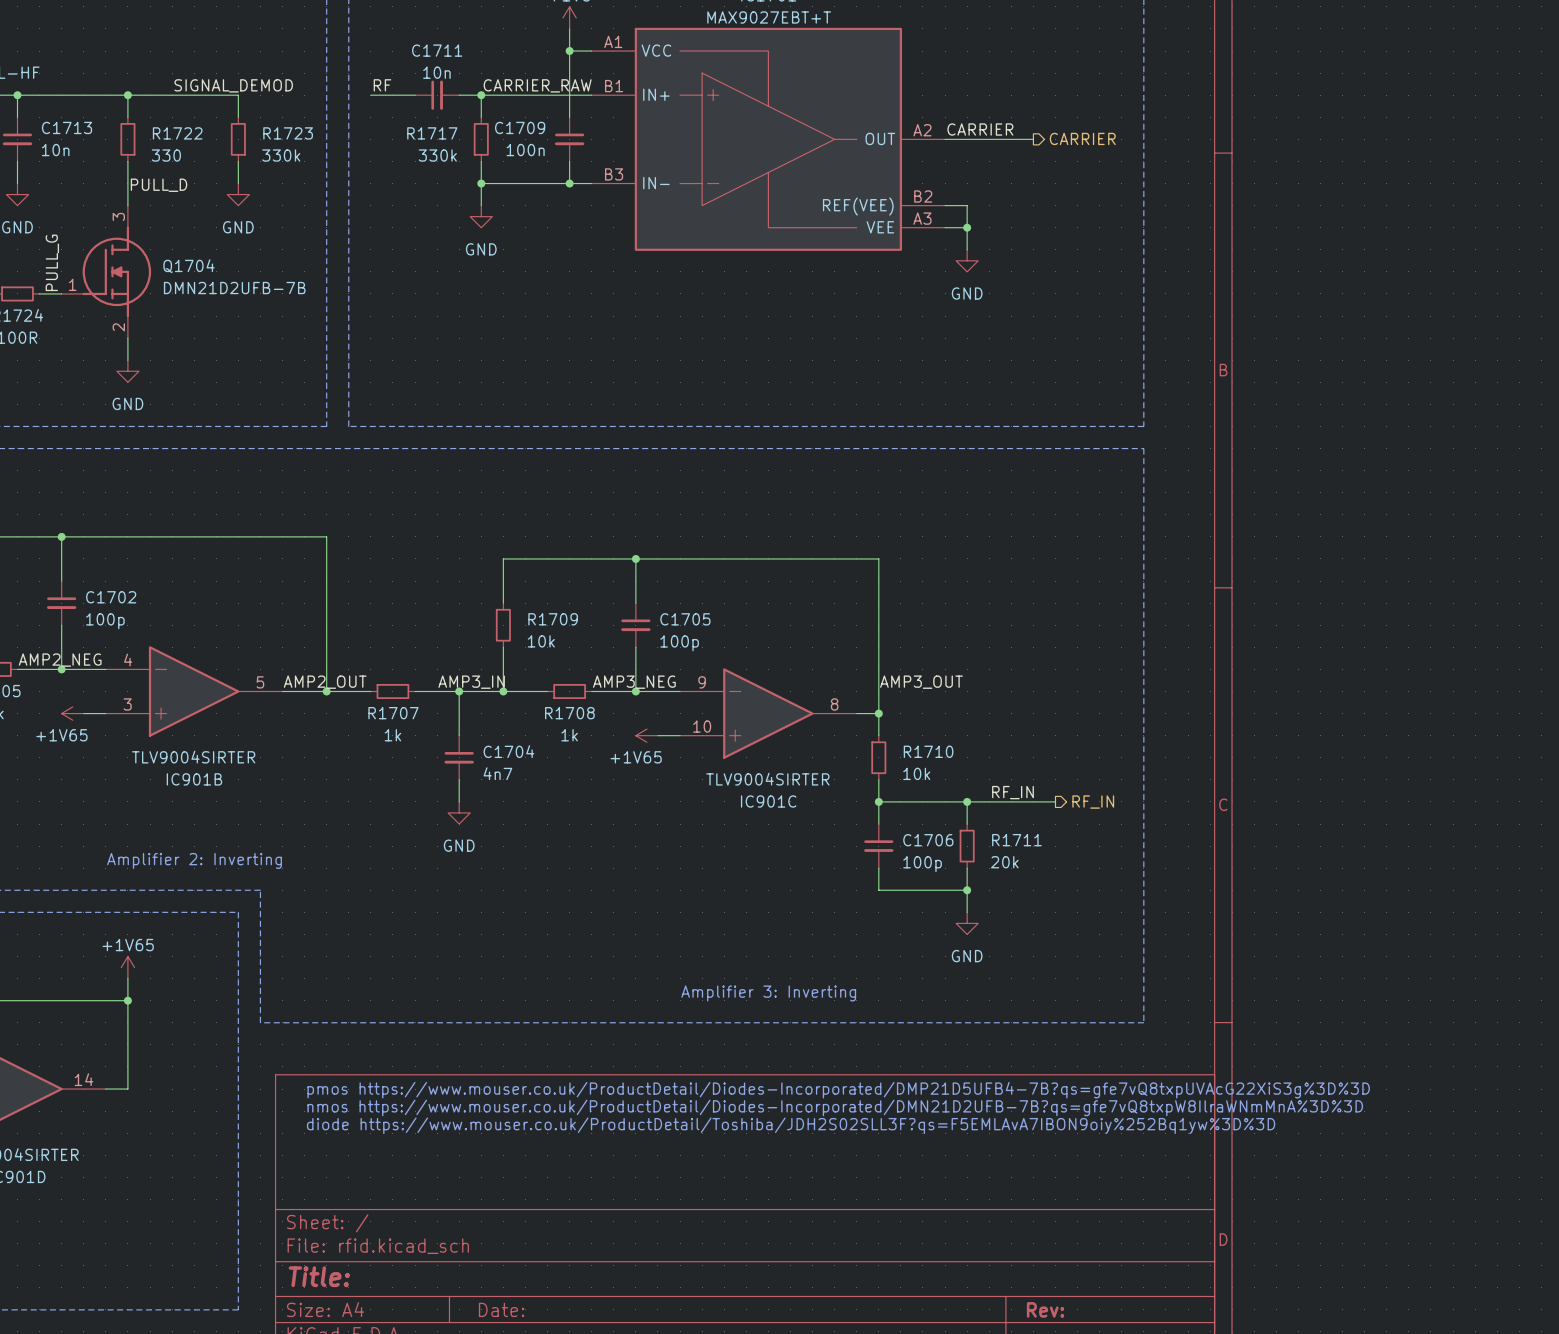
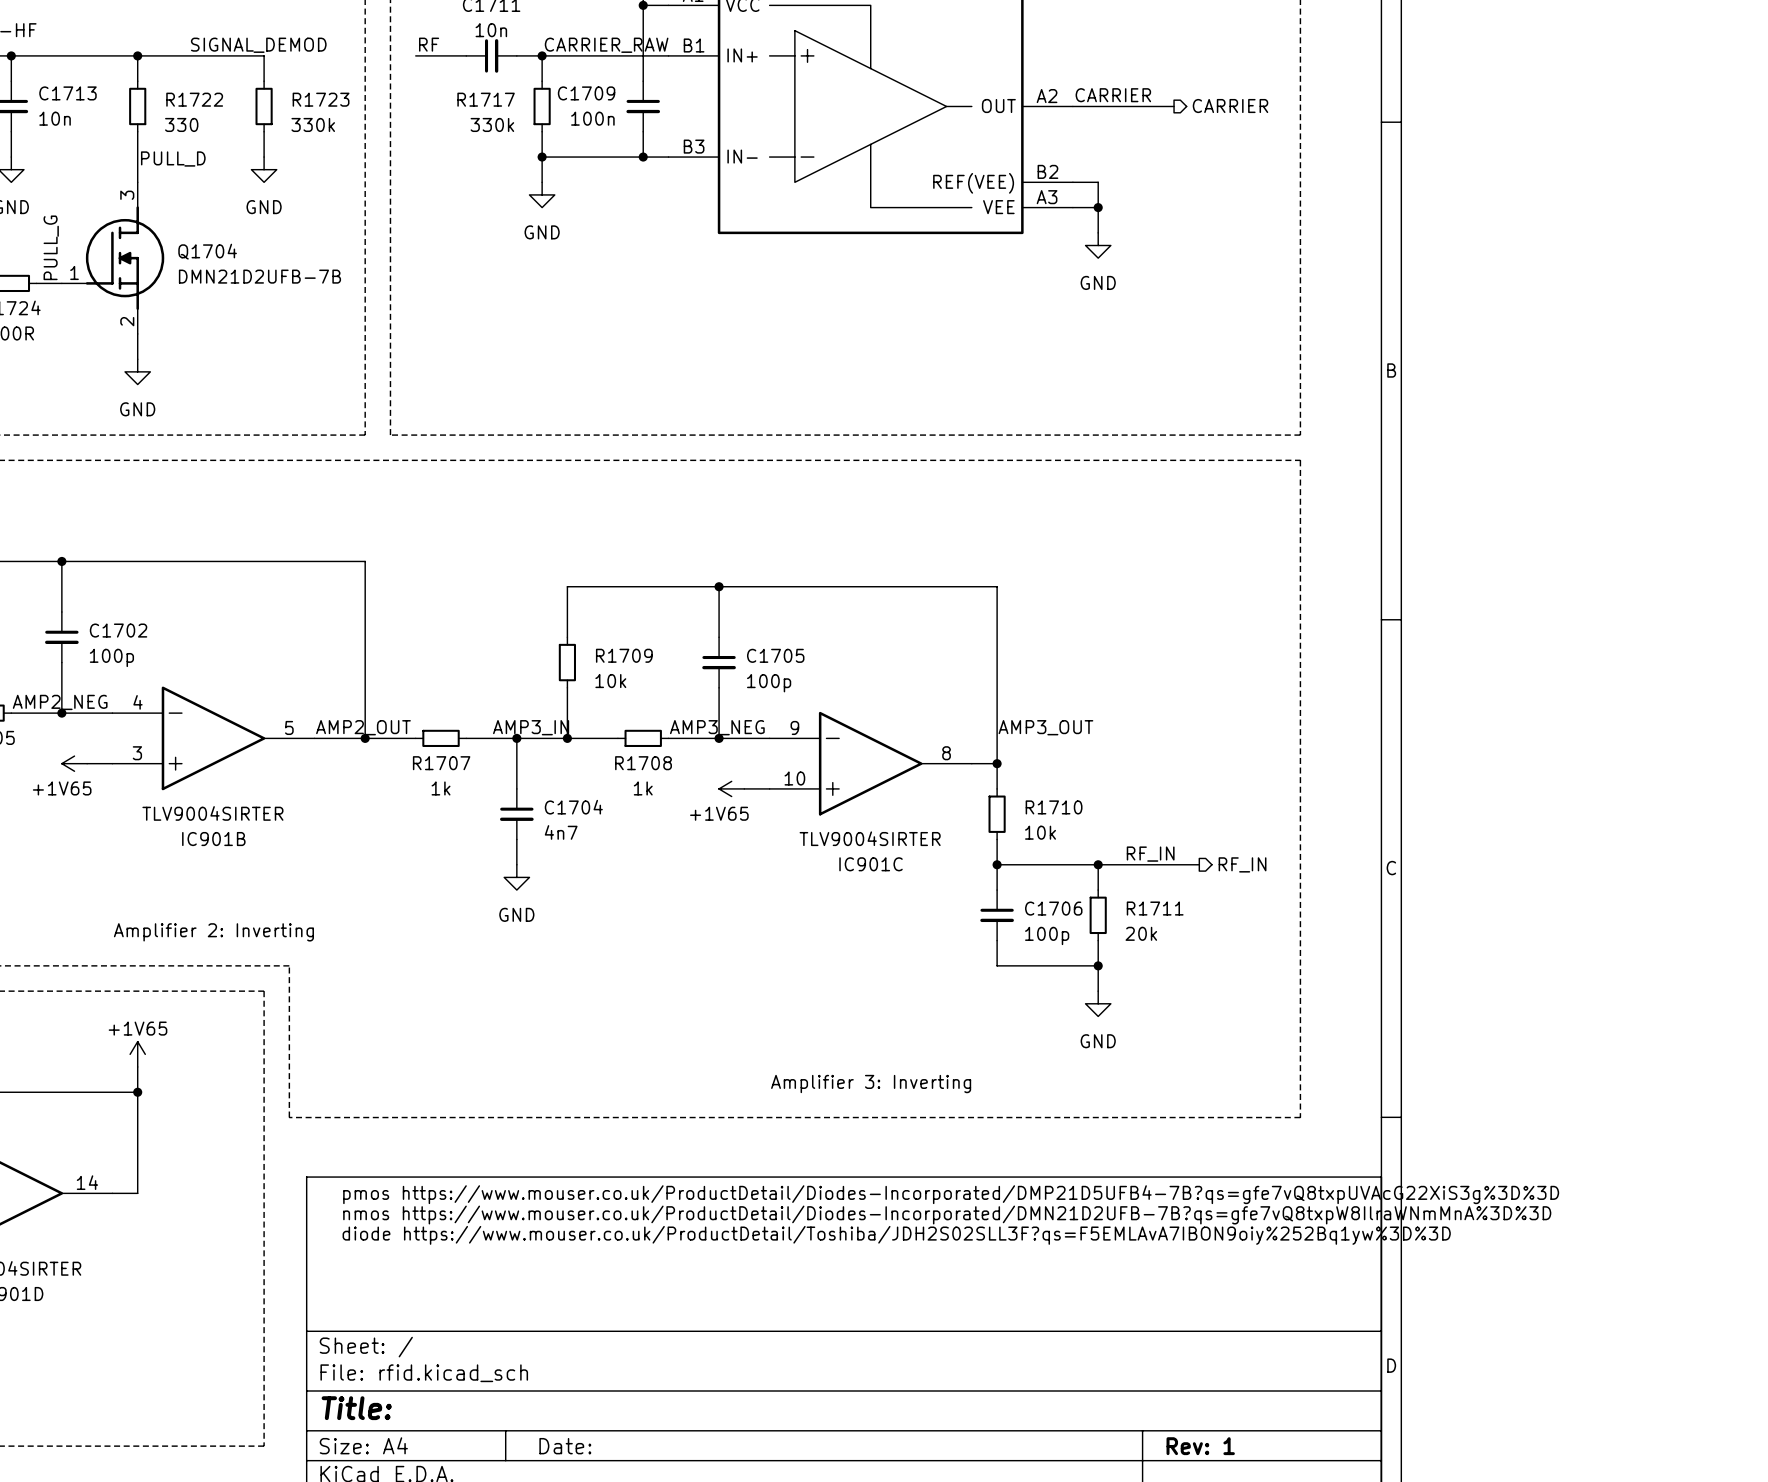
title block: Rev: (1045, 1309) -> Rev: 1 (1200, 1446)

